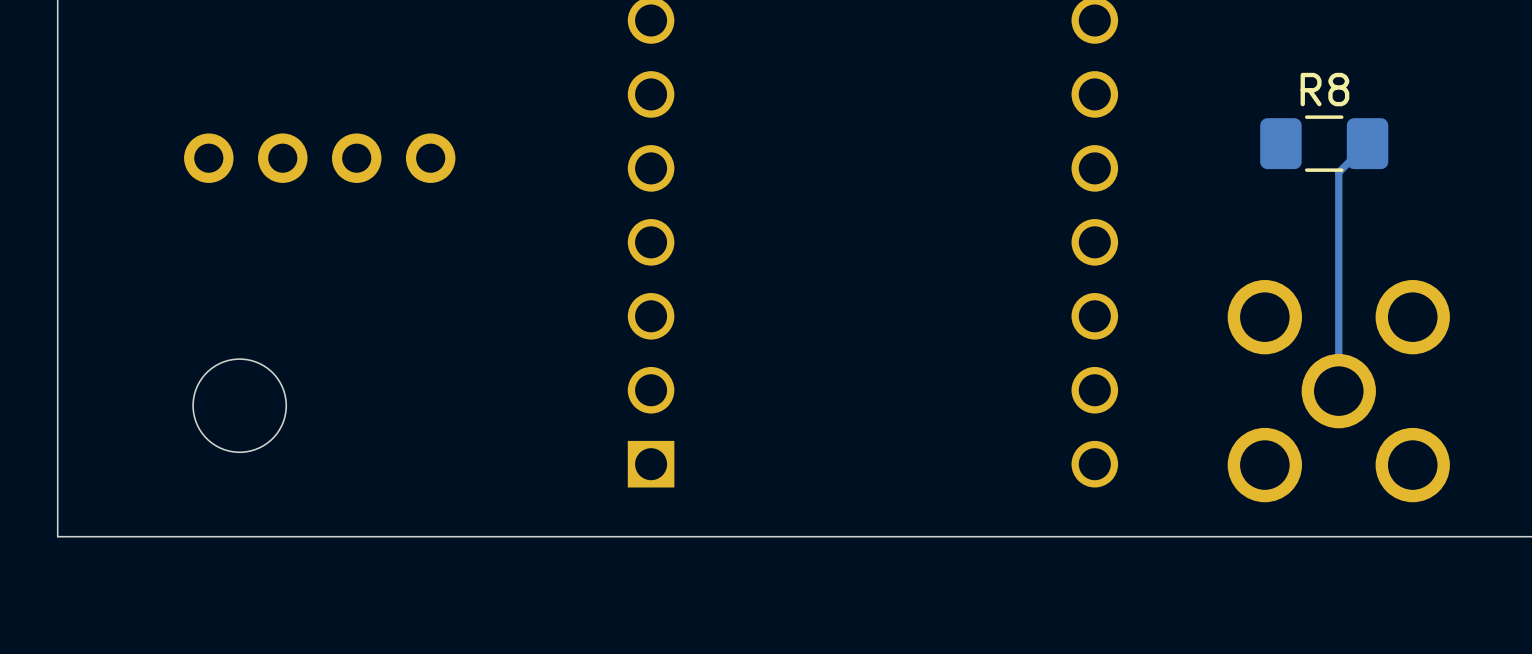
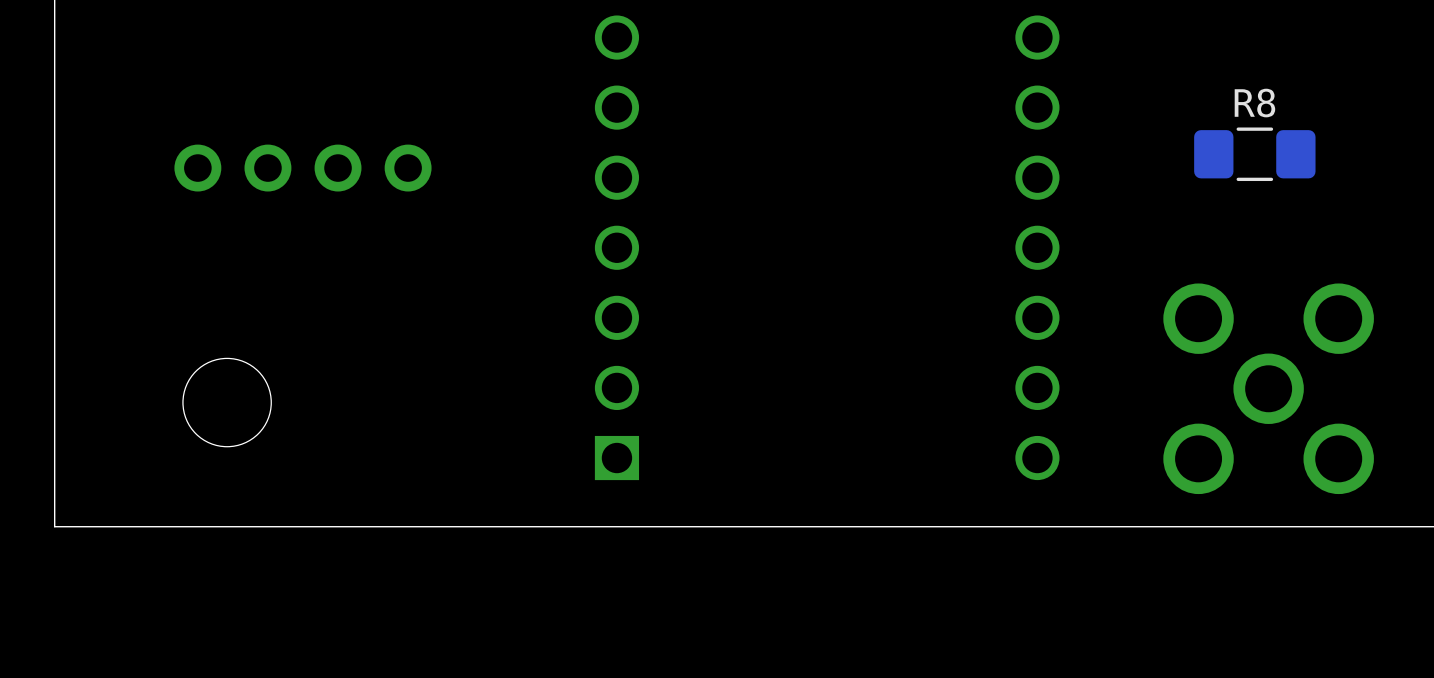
track: (1367, 143) (1338, 172) (1338, 391) -> none

